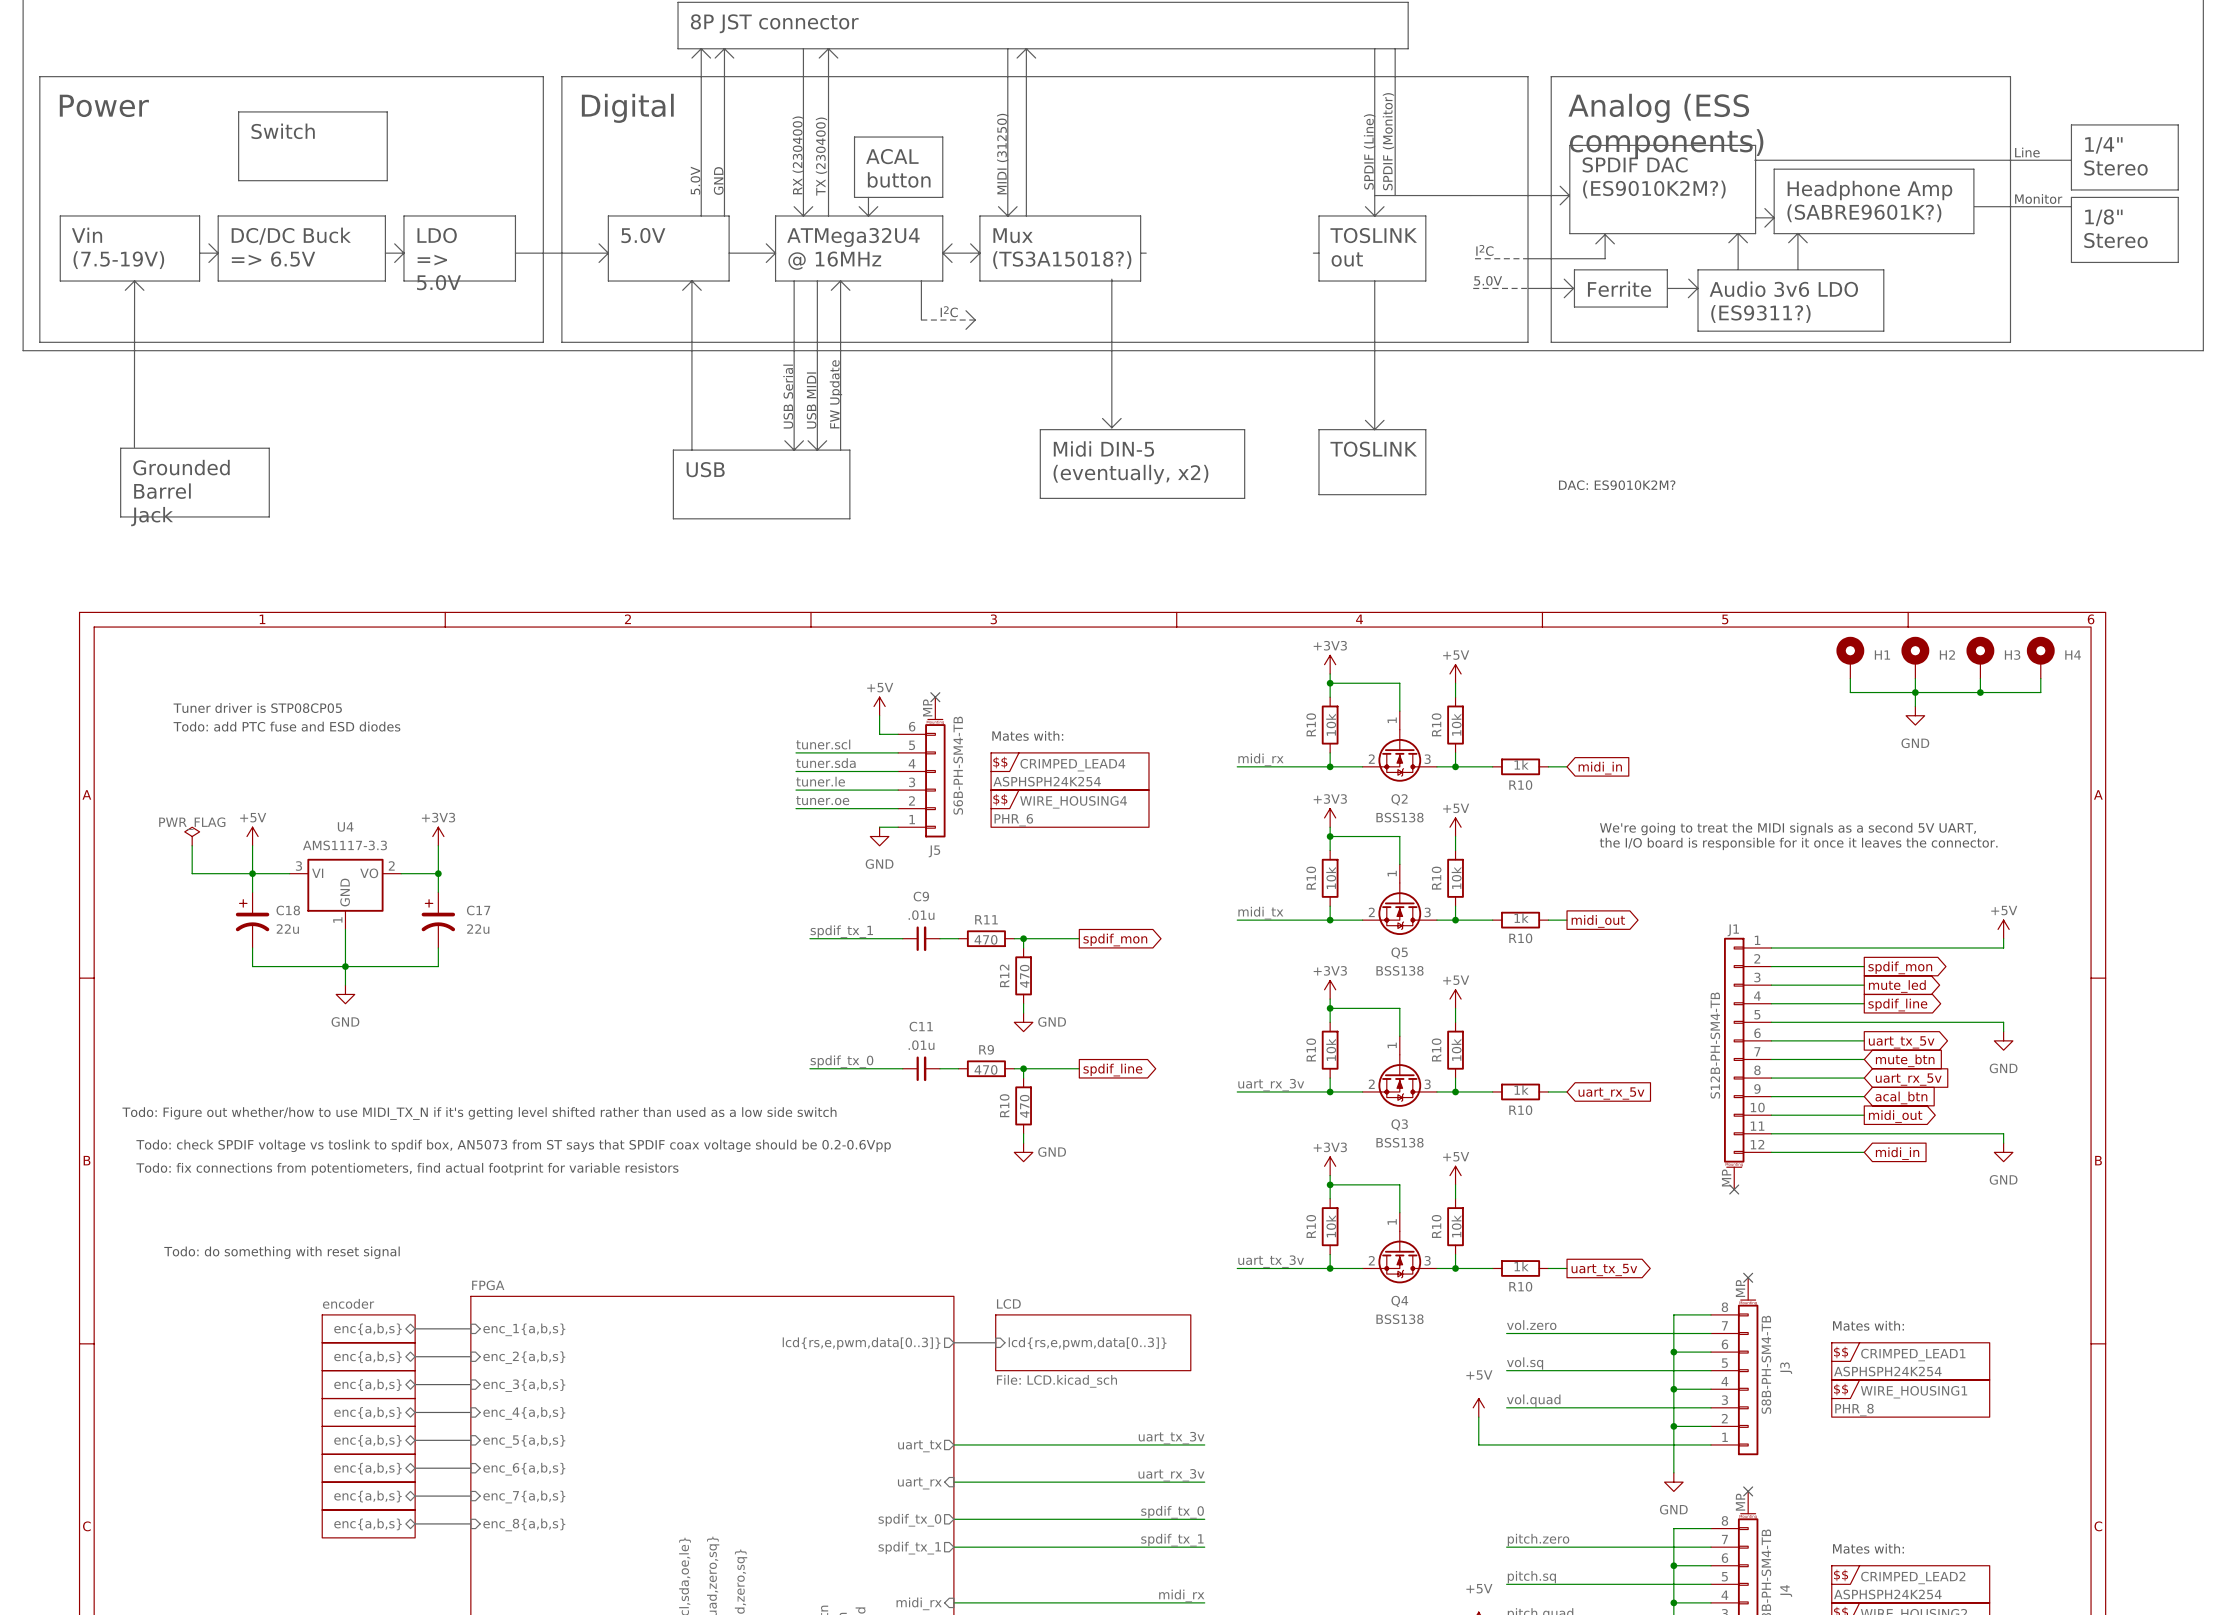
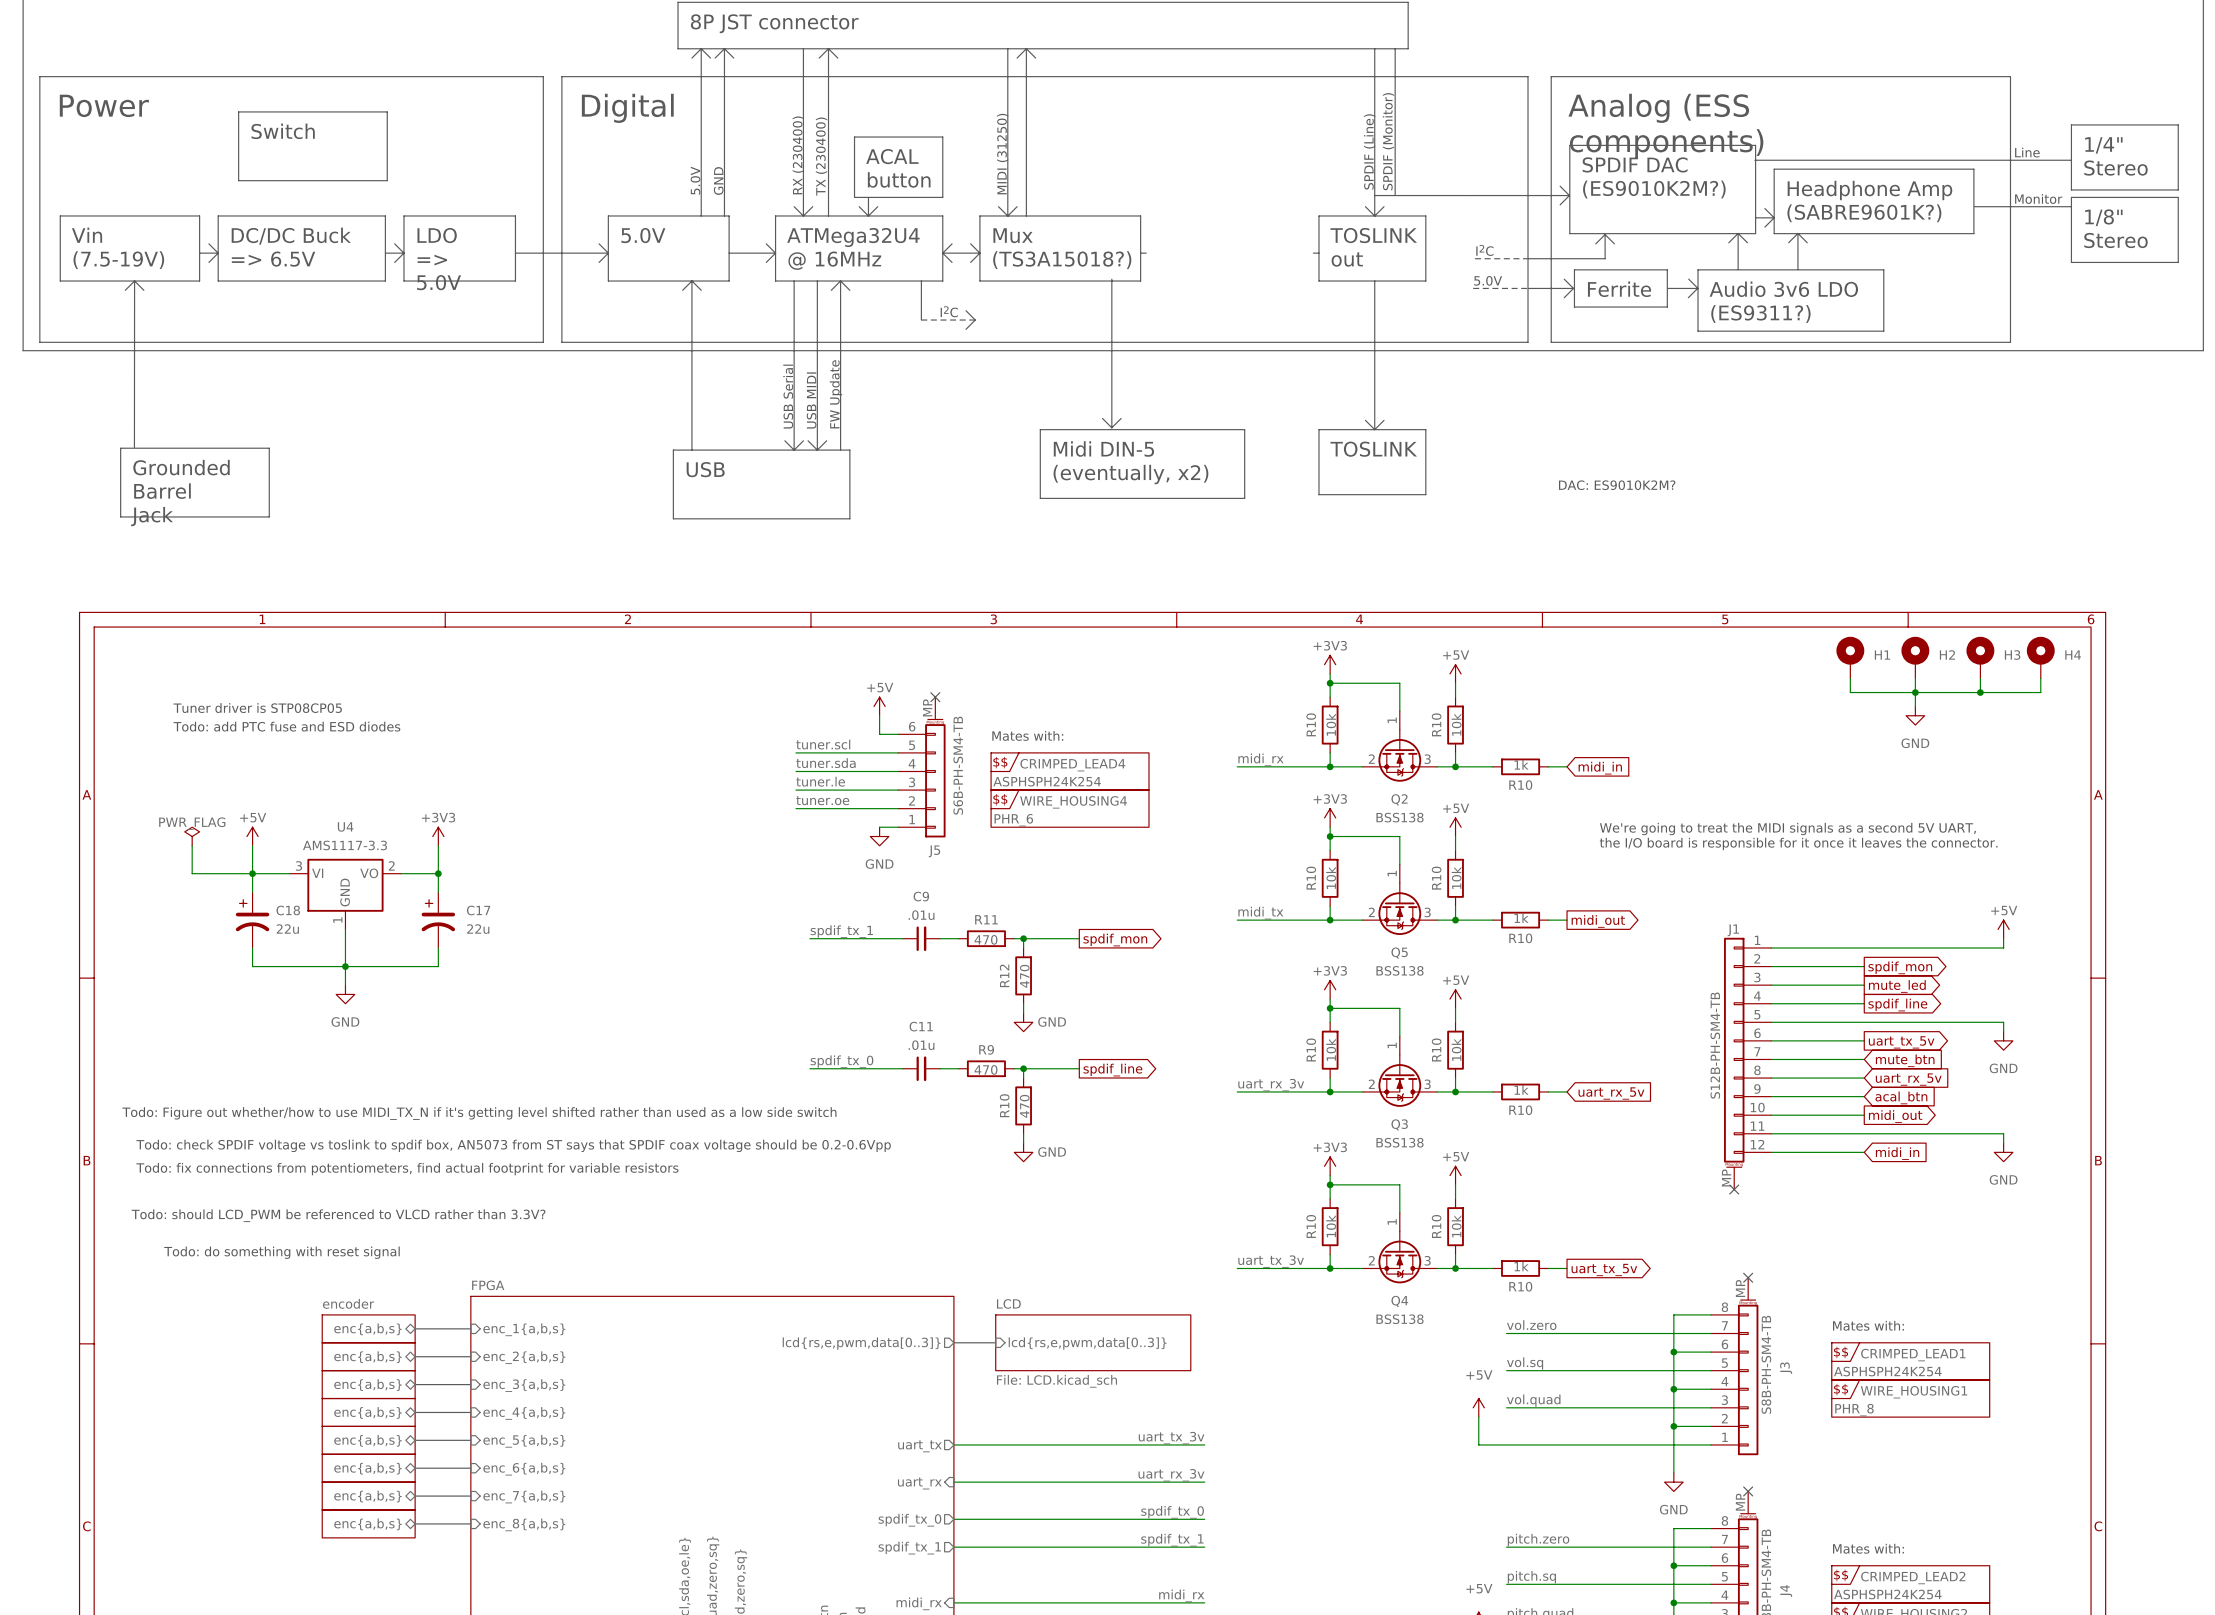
text: none -> Todo: should LCD_PWM be referenced to VLCD rather than 3.3V? (338, 1215)

